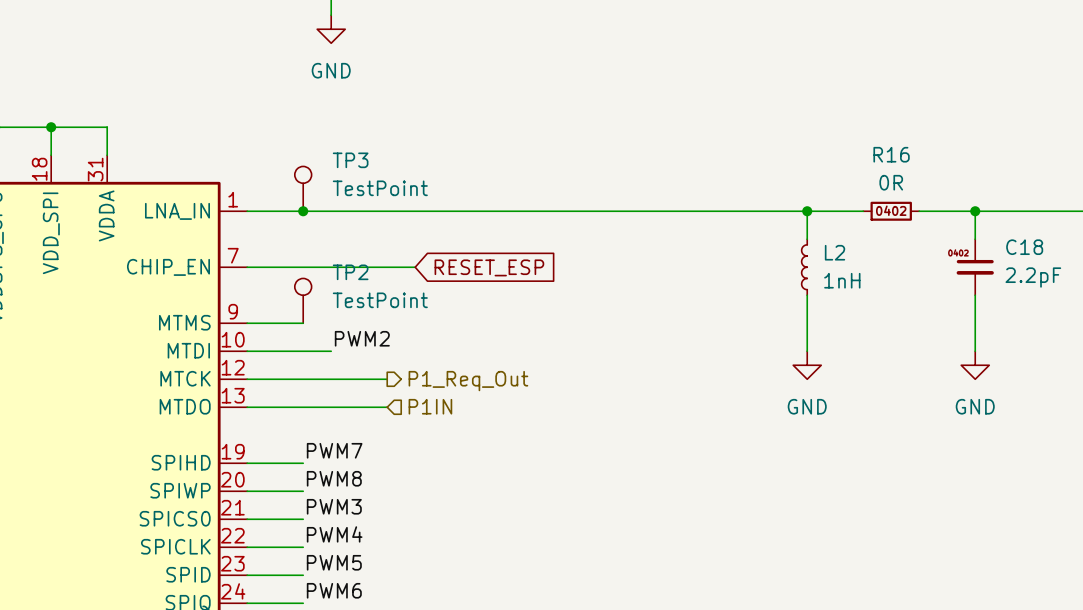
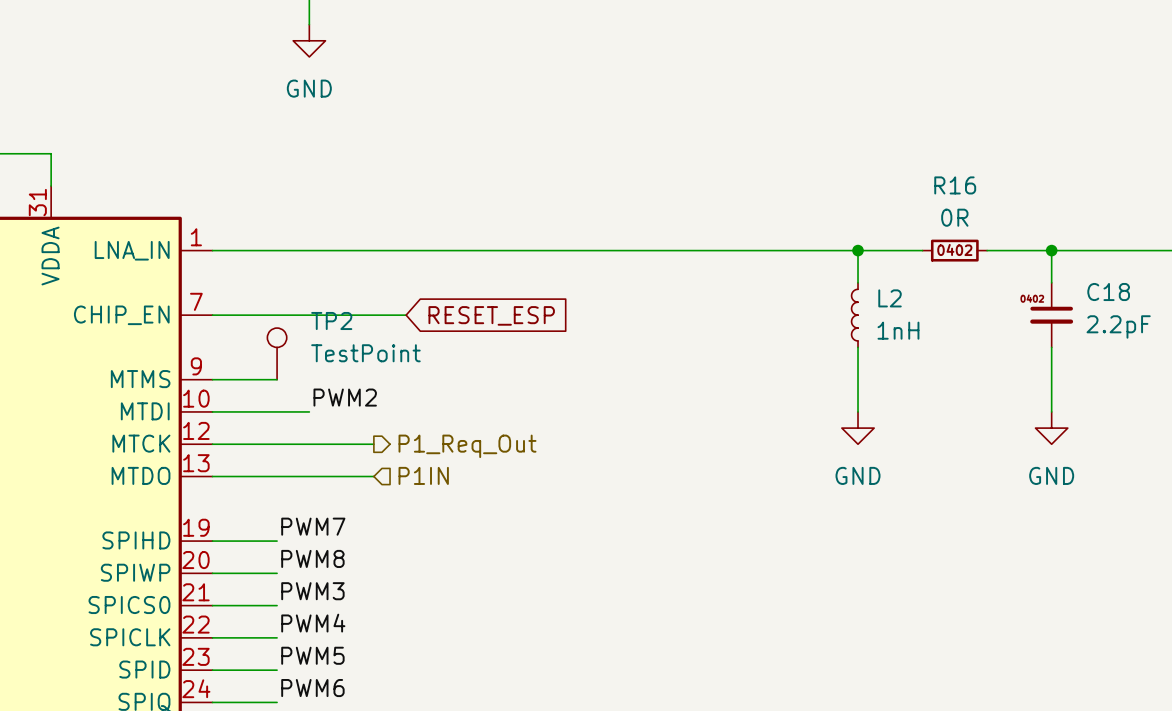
TP3: TestPoint (303, 188) -> none
junction: (303, 211) -> none

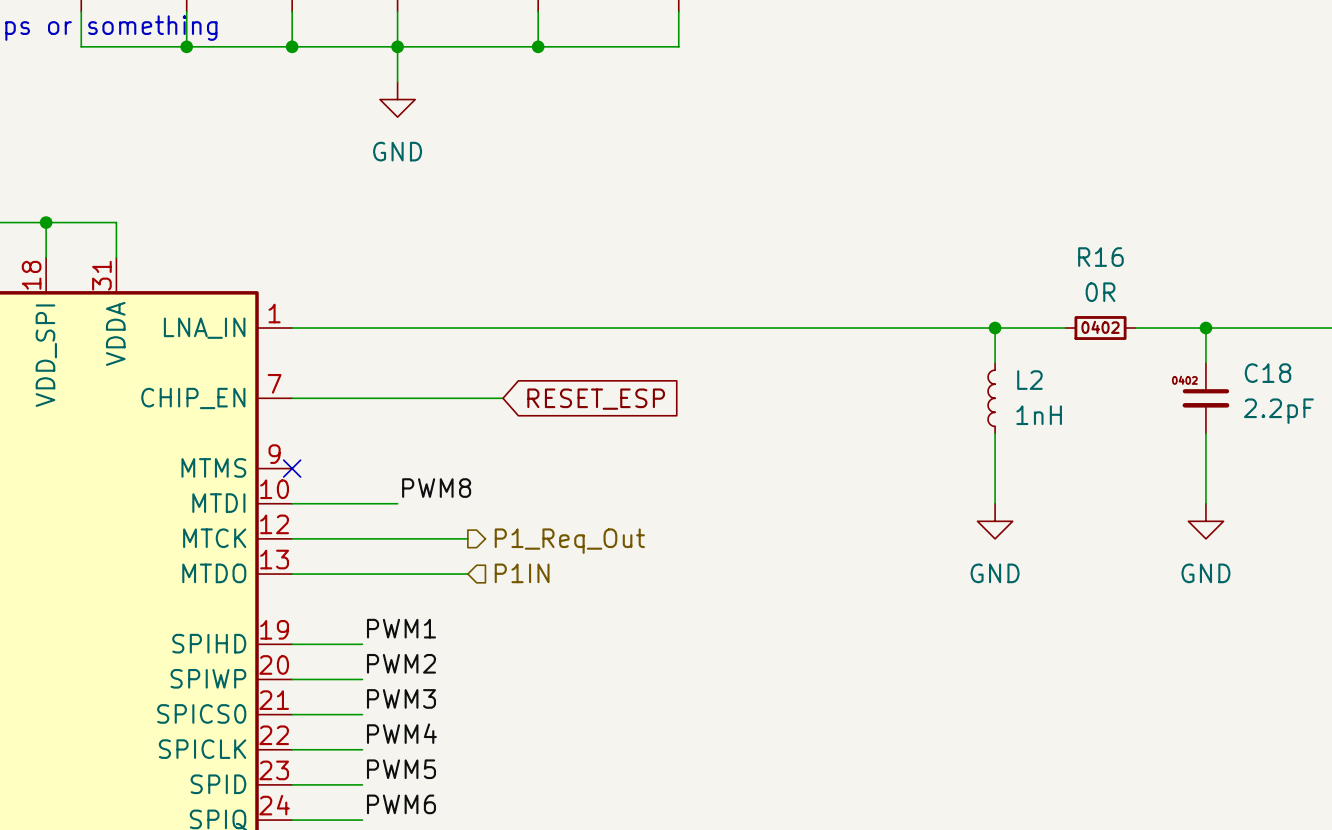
TP2: TestPoint (277, 353) -> none
wire: (212, 379) (277, 379) -> none
no-connect mark: none -> (292, 468)
label: PWM2 (345, 397) -> PWM8 (436, 488)
label: PWM7 (313, 526) -> PWM1 (401, 628)
label: PWM8 (312, 558) -> PWM2 (401, 663)

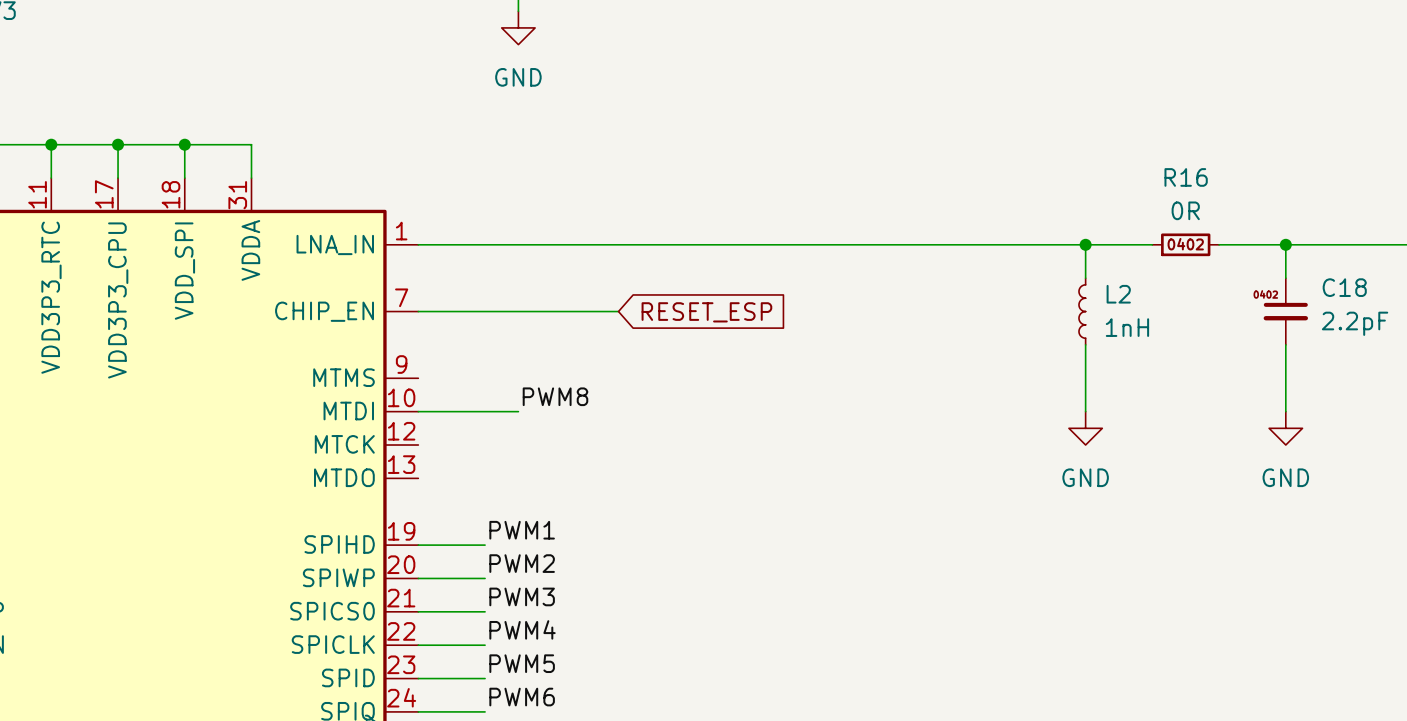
no-connect mark: (292, 468) -> none
wire: (292, 538) (467, 538) -> none
hierarchical label: P1_Req_Out (569, 541) -> none
hierarchical label: P1IN (522, 573) -> none
wire: (292, 574) (467, 574) -> none

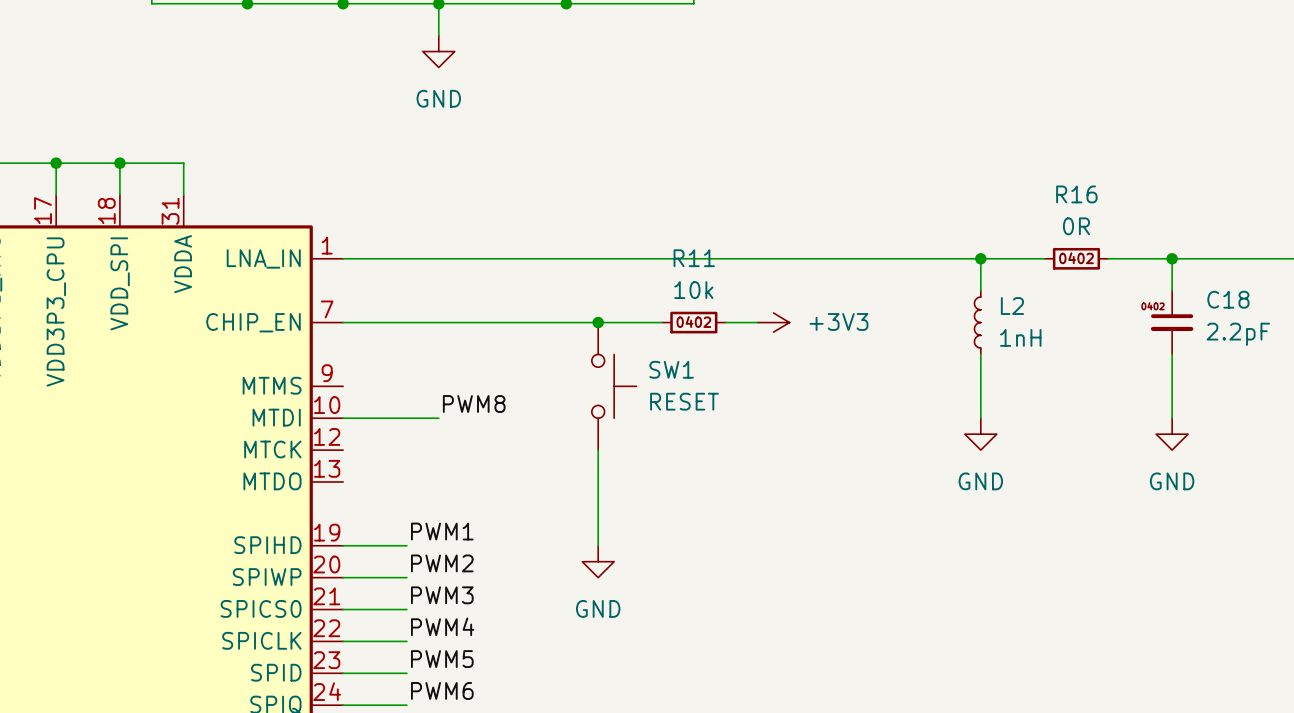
wire: none -> (534, 322) (661, 322)
junction: none -> (598, 322)
R11: none -> 10k (693, 322)
wire: none -> (725, 322) (757, 322)
power symbol: none -> +3V3 (773, 322)
global label: RESET_ESP (706, 312) -> none
SW1: none -> RESET (614, 386)
wire: none -> (598, 450) (598, 545)
power symbol: none -> GND (598, 561)

